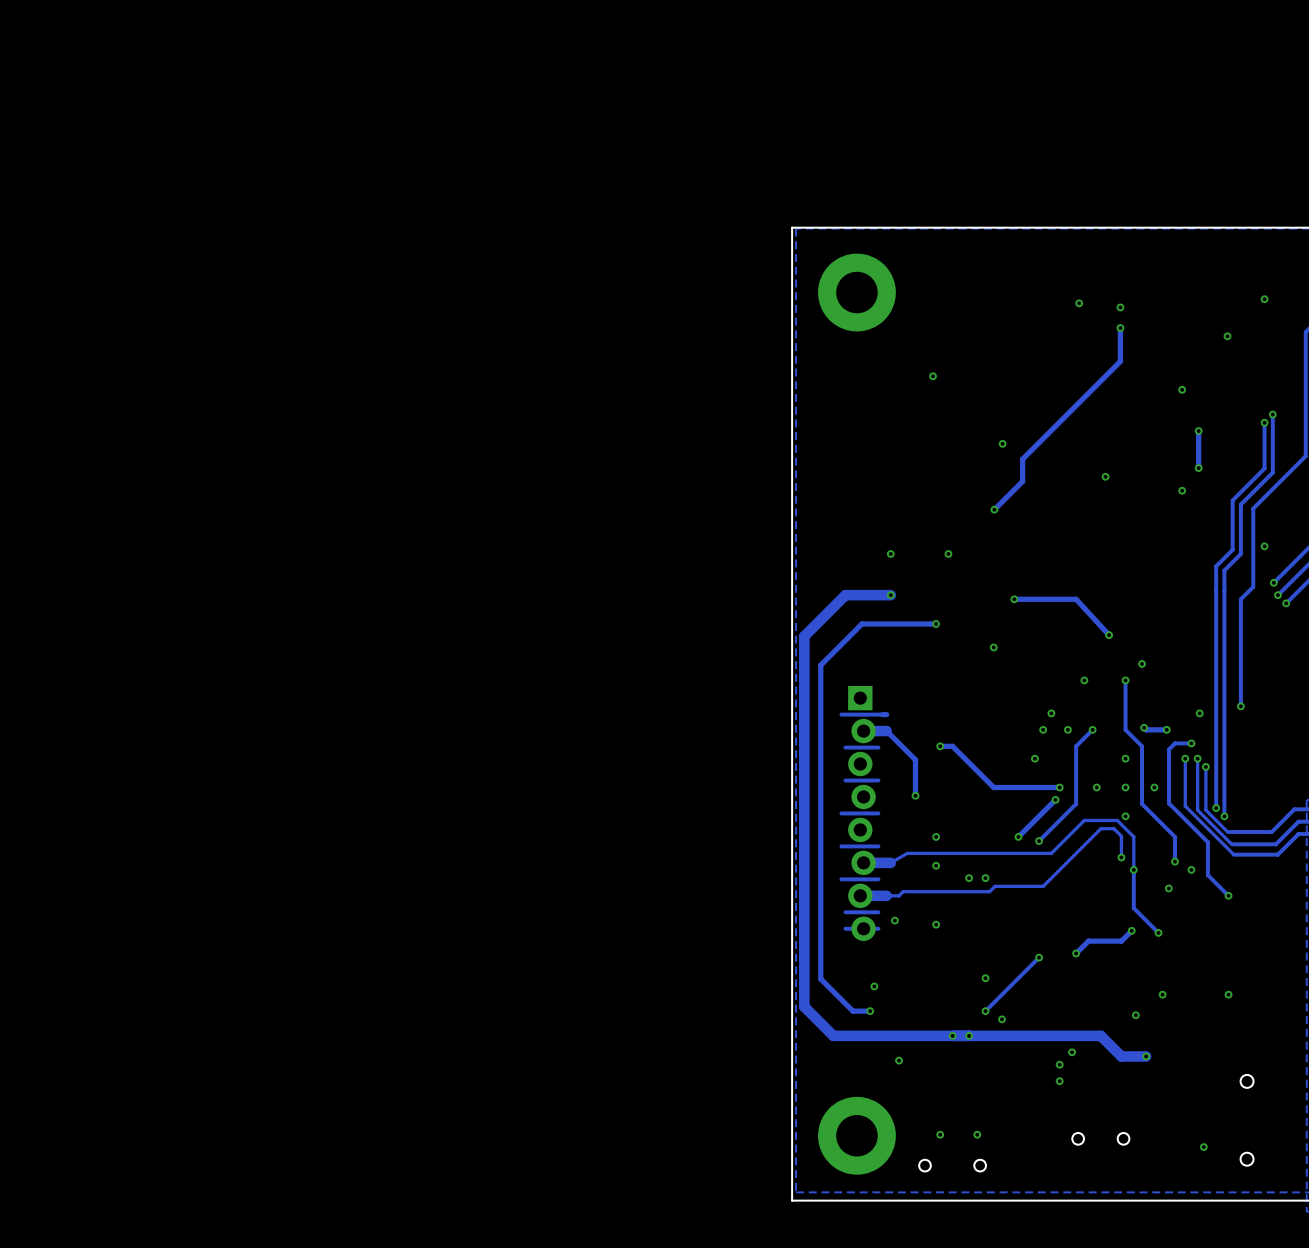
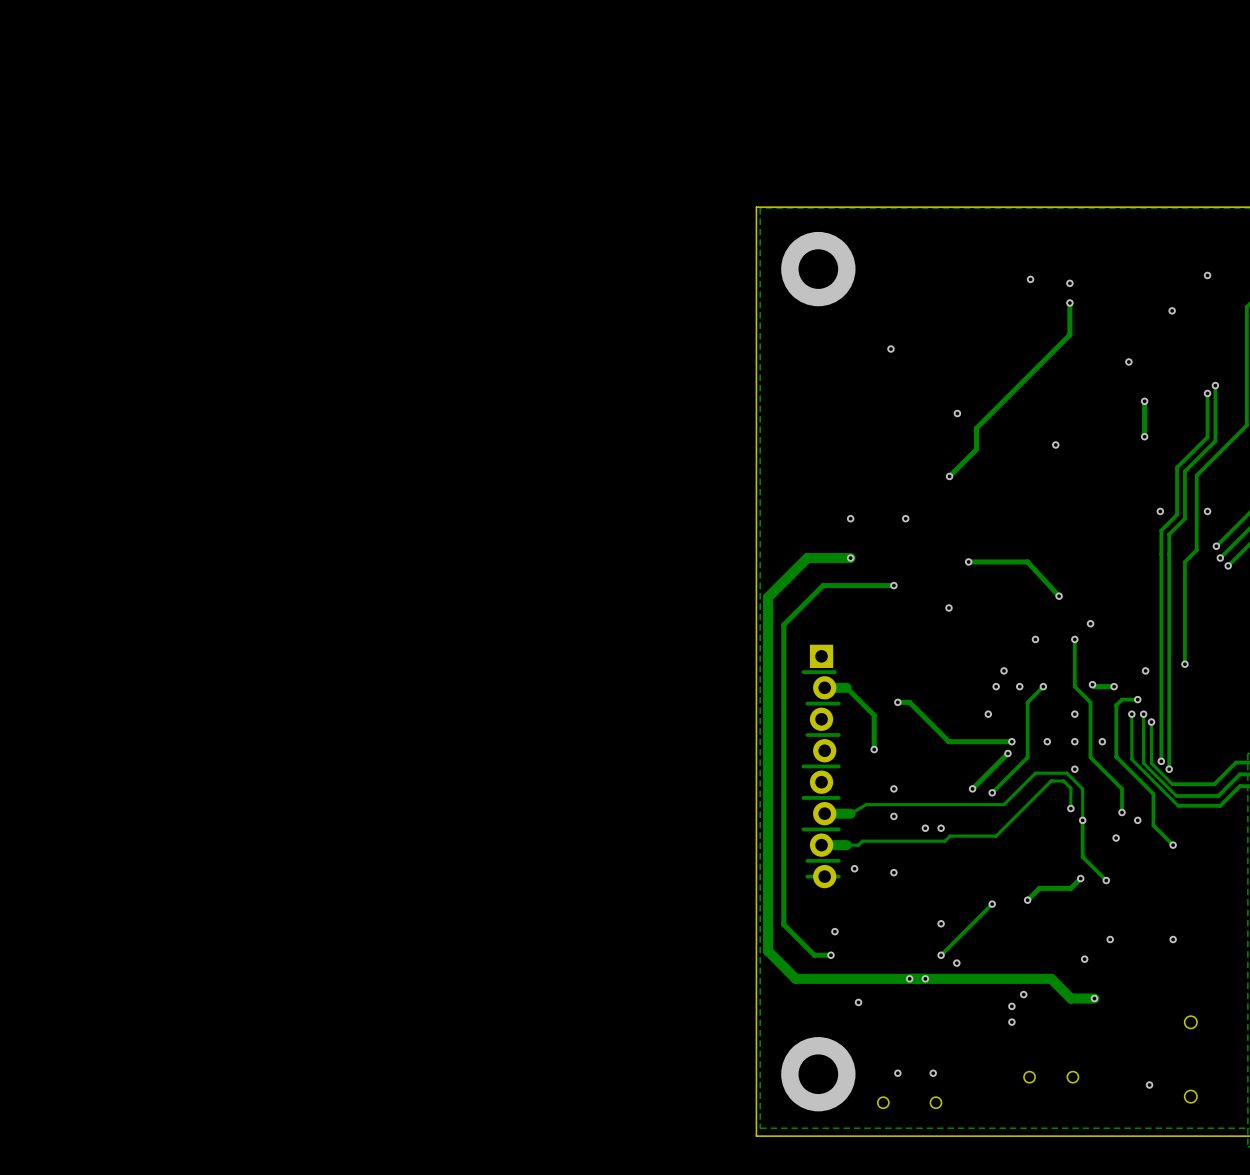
via position: (1182, 490) -> (1160, 511)
track: (886, 714) (874, 714) -> none

